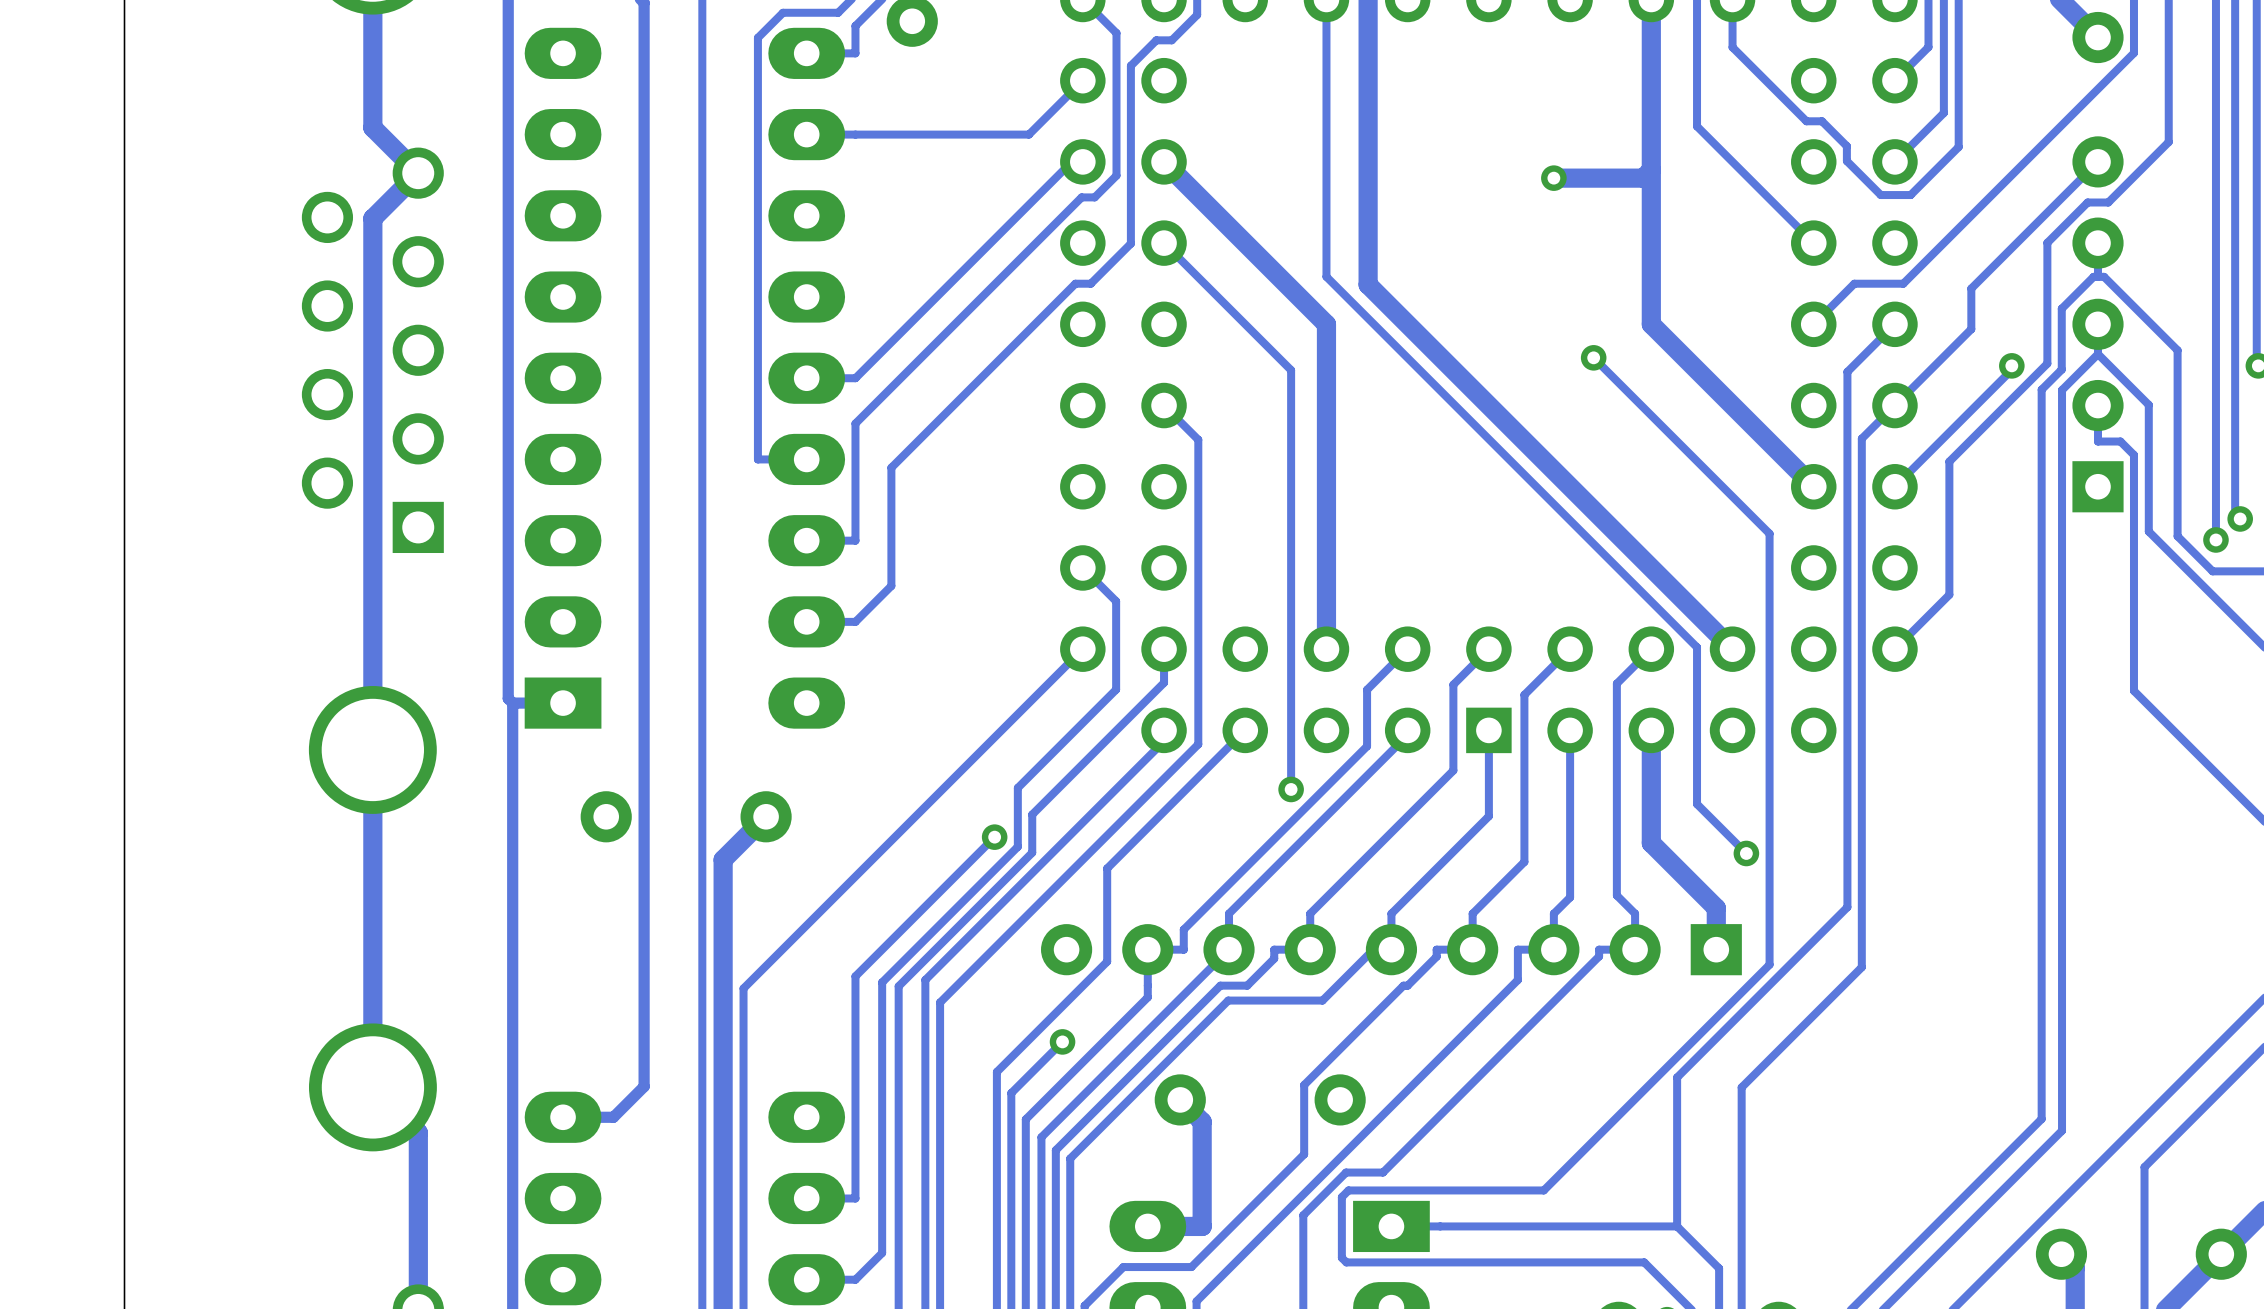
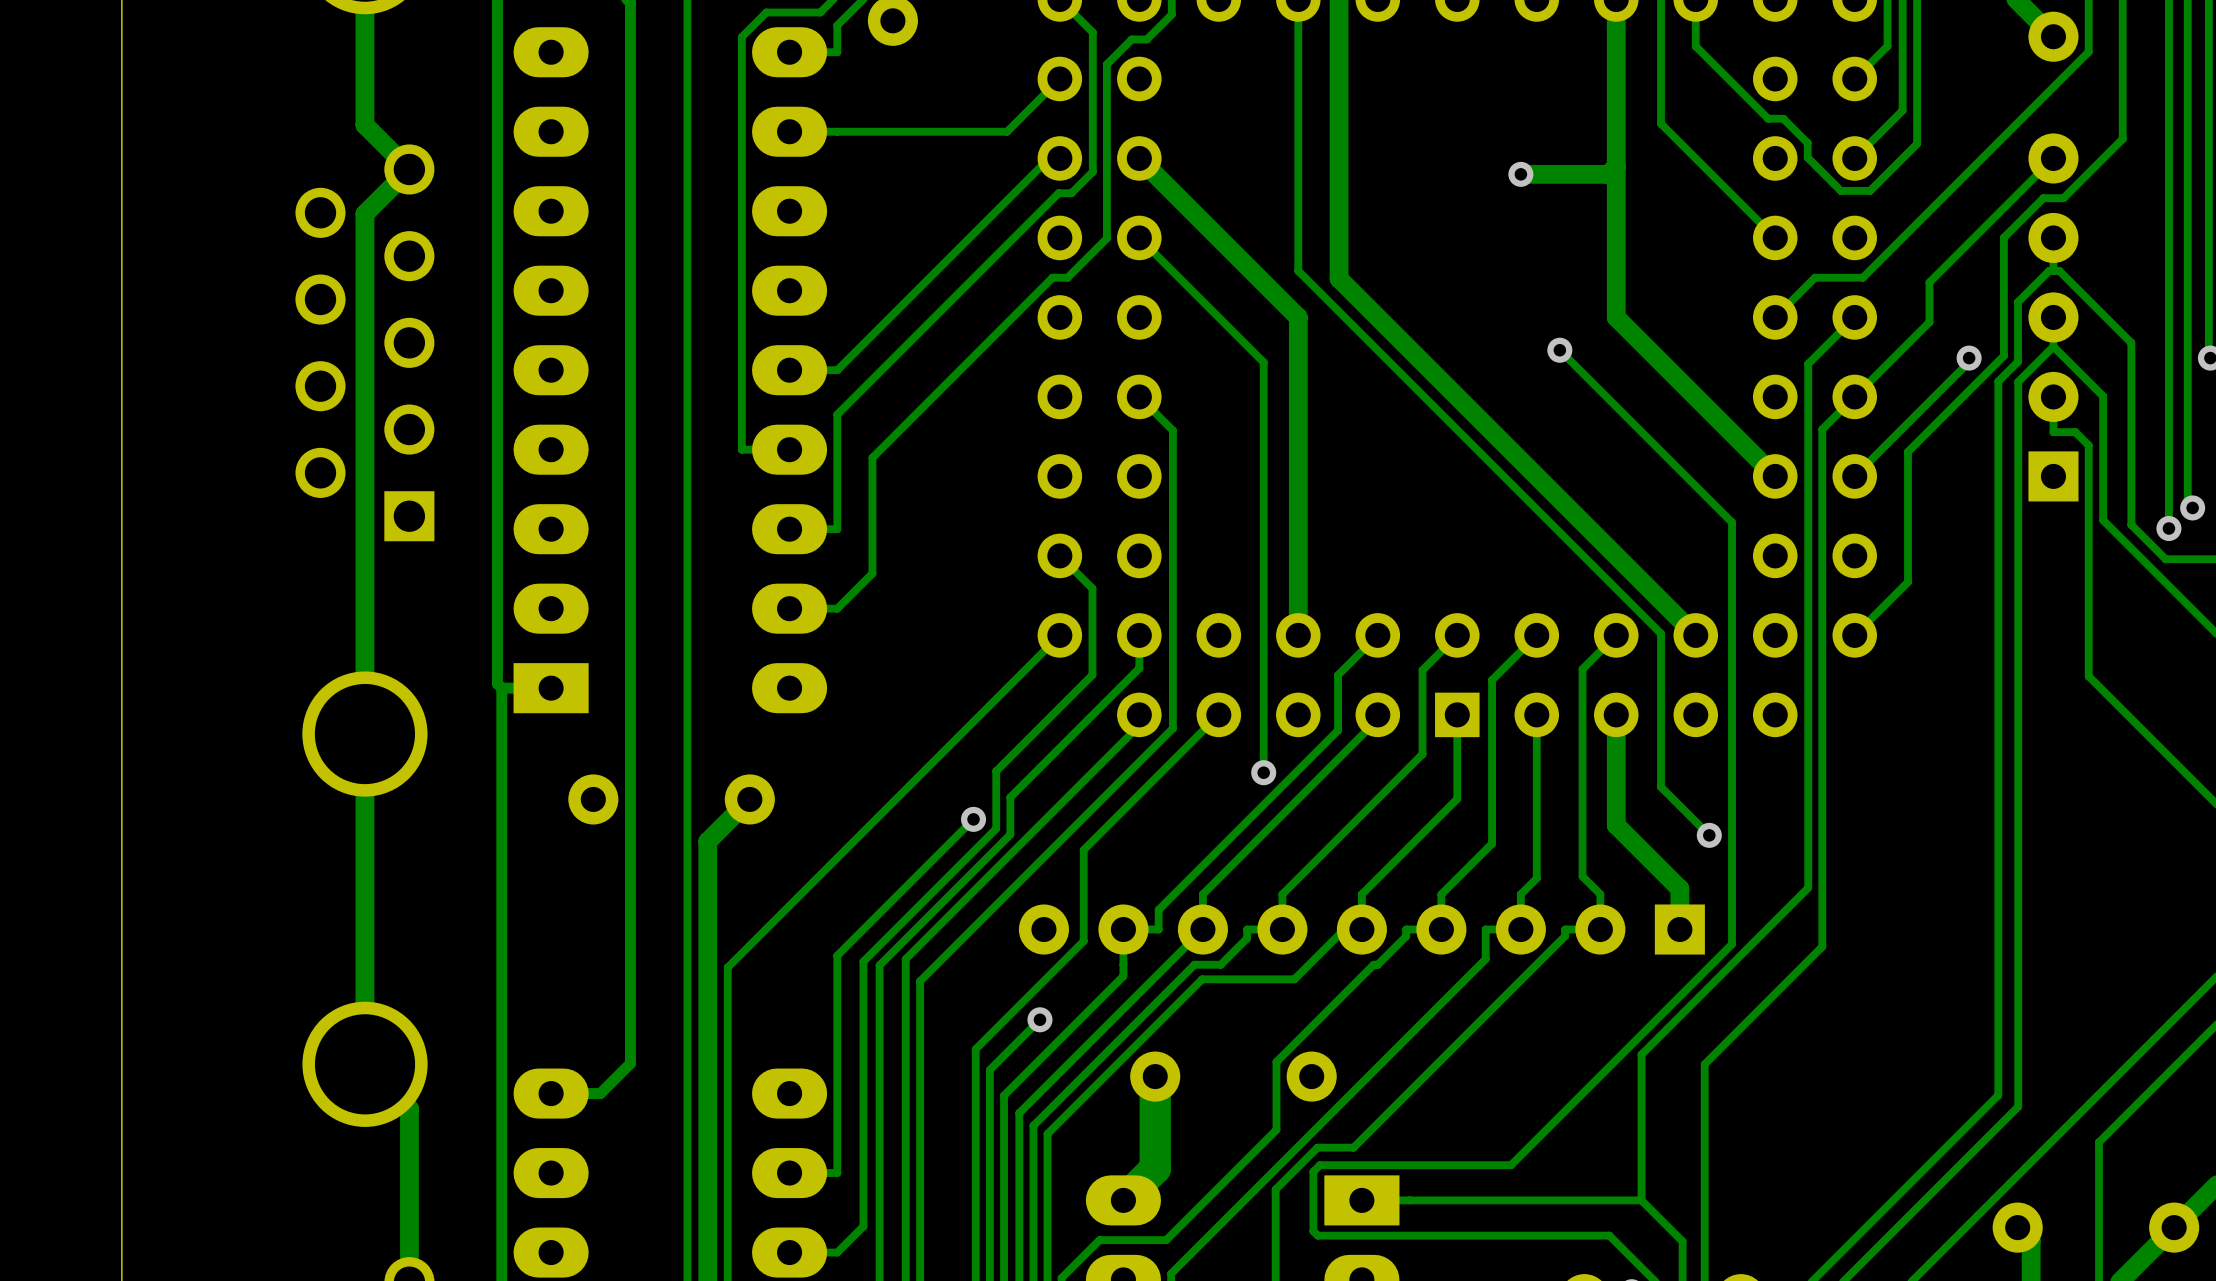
track: (1180, 1099) (1202, 1121) (1202, 1226) (1147, 1226) -> (1155, 1076) (1155, 1168) (1123, 1200)

